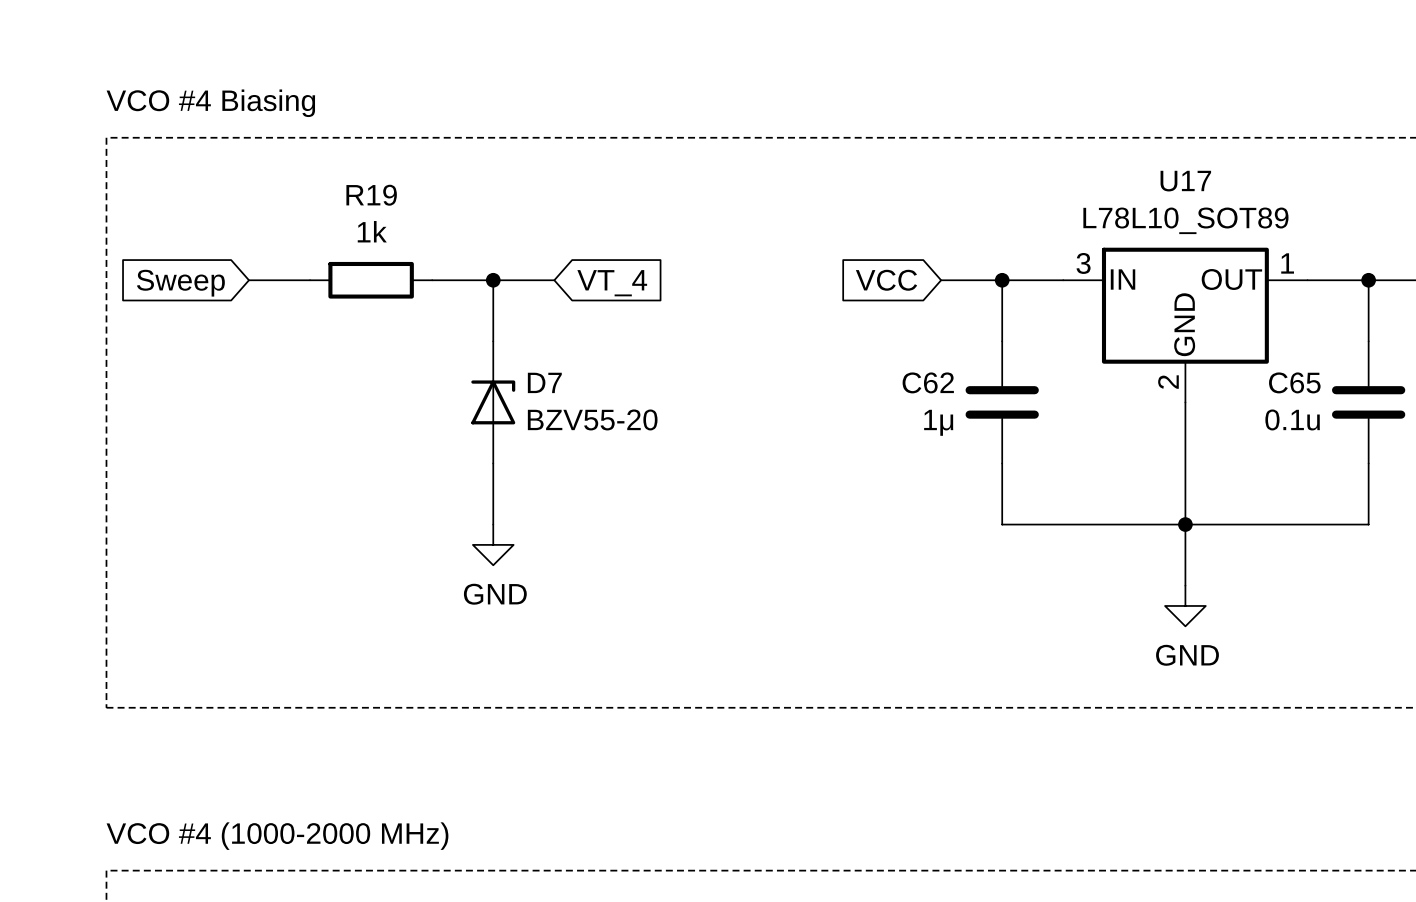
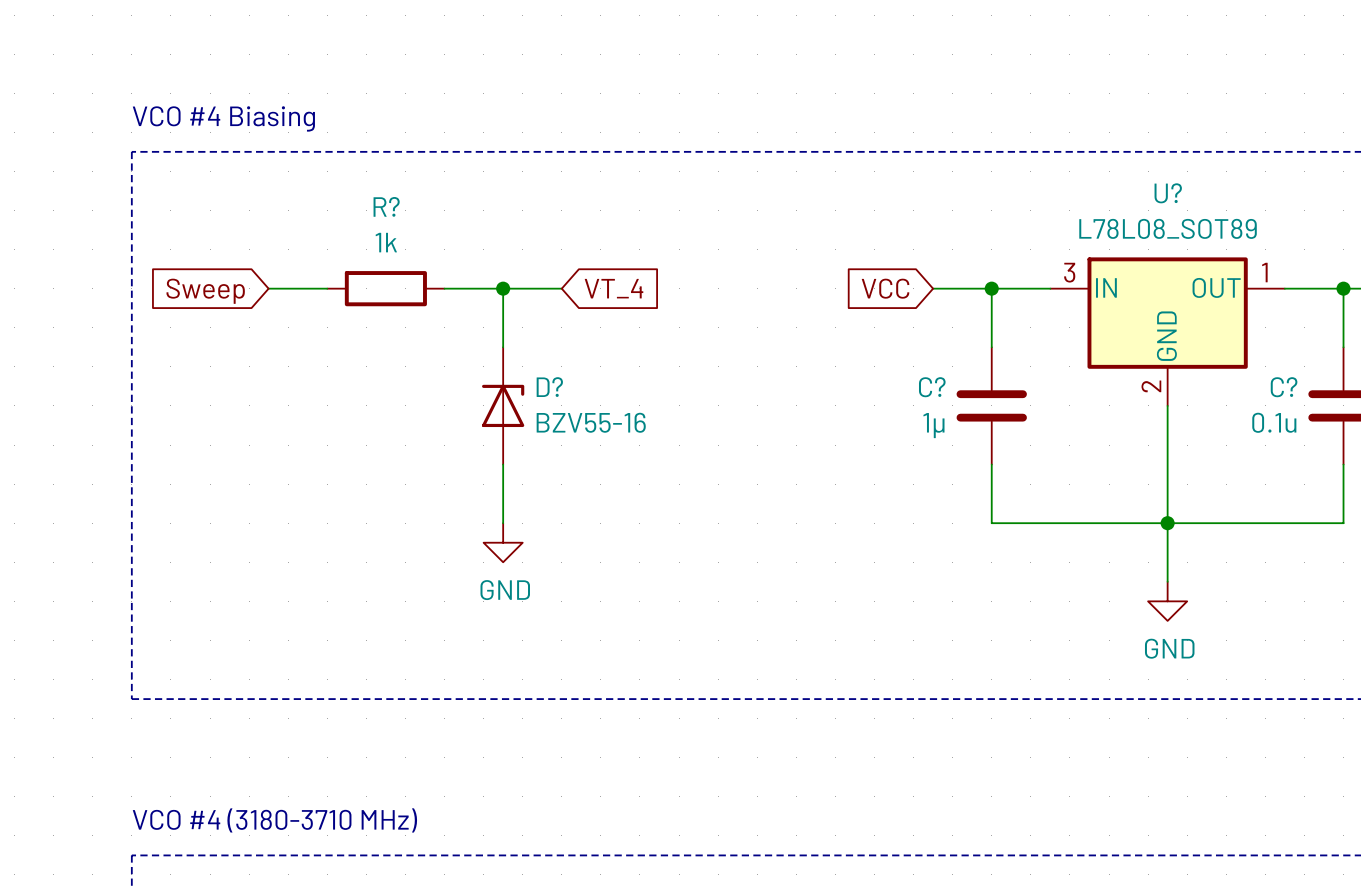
U17 name: U17 (1185, 181) -> U? (1168, 193)
R19 name: R19 (371, 195) -> R? (386, 206)
U17 value: L78L10_SOT89 (1185, 220) -> L78L08_SOT89 (1168, 228)
D7 name: D7 (544, 382) -> D? (549, 387)
C62 name: C62 (928, 382) -> C? (932, 387)
C65 name: C65 (1294, 382) -> C? (1284, 387)
D7 value: BZV55-20 (592, 419) -> BZV55-16 (591, 422)
text: VCO #4 (1000-2000 MHz) (277, 836) -> VCO #4 (3180-3710 MHz) (274, 820)

